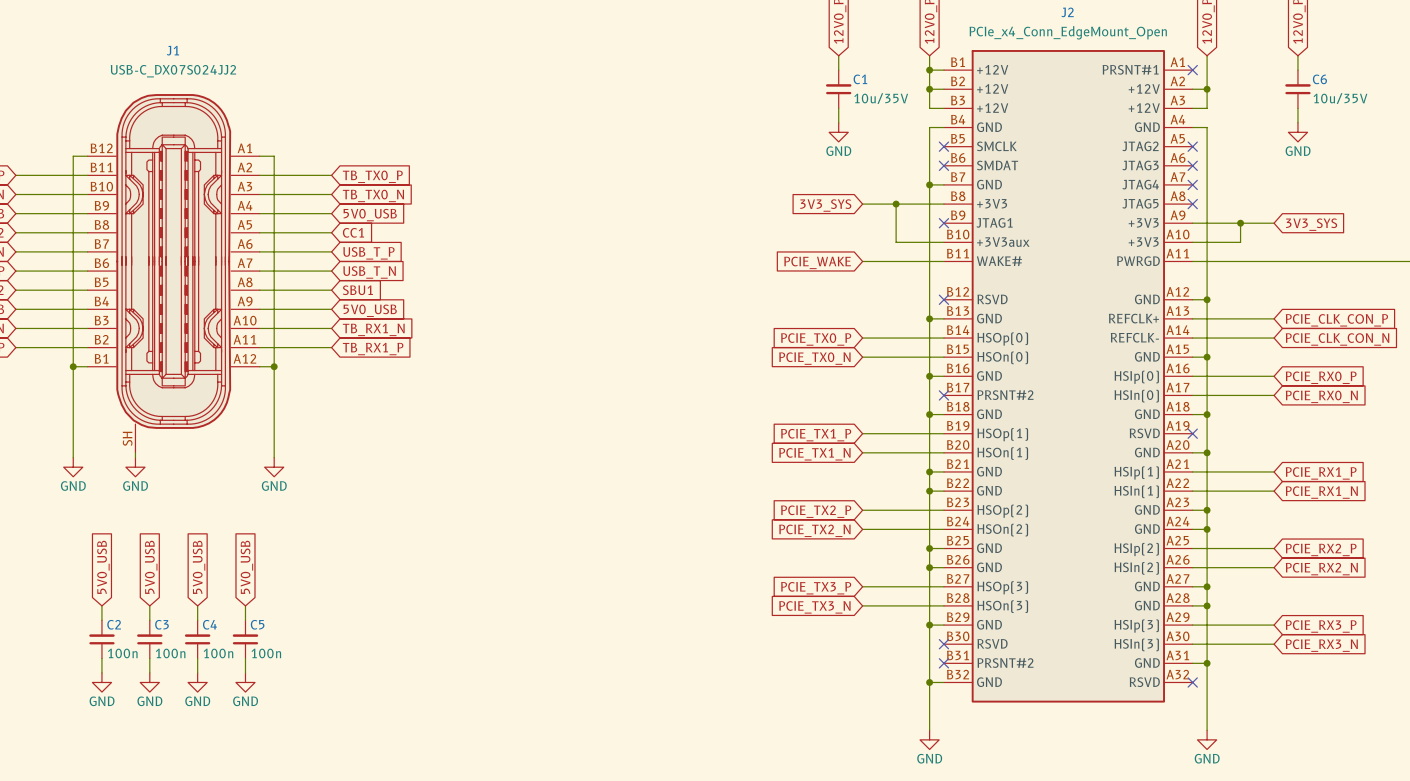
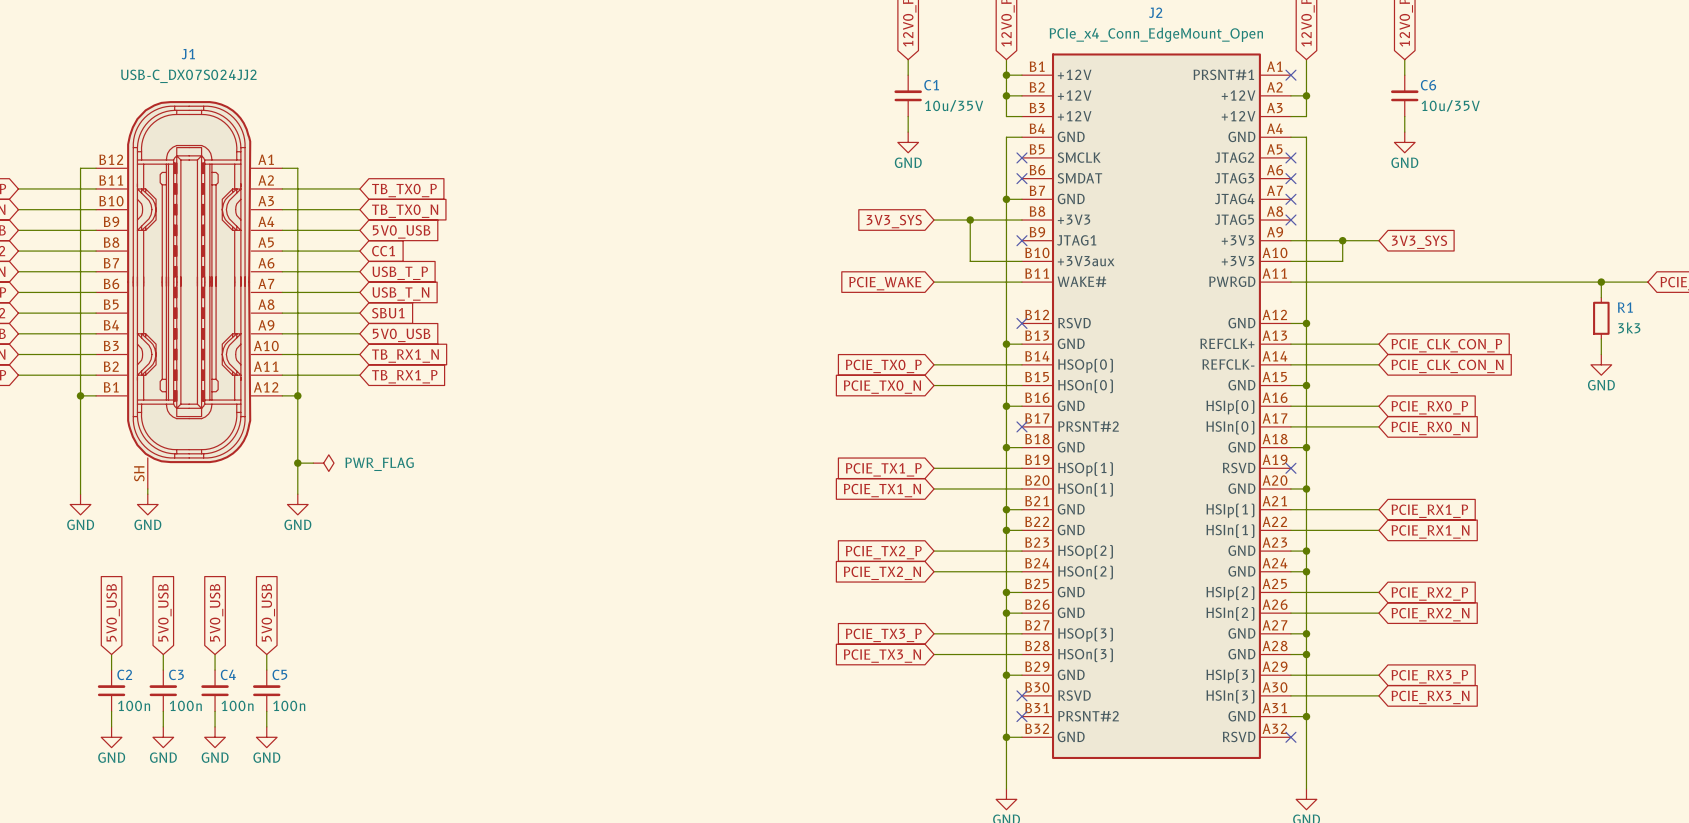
wire: none -> (297, 463) (313, 463)
junction: none -> (297, 463)
power symbol: none -> PWR_FLAG (323, 463)

